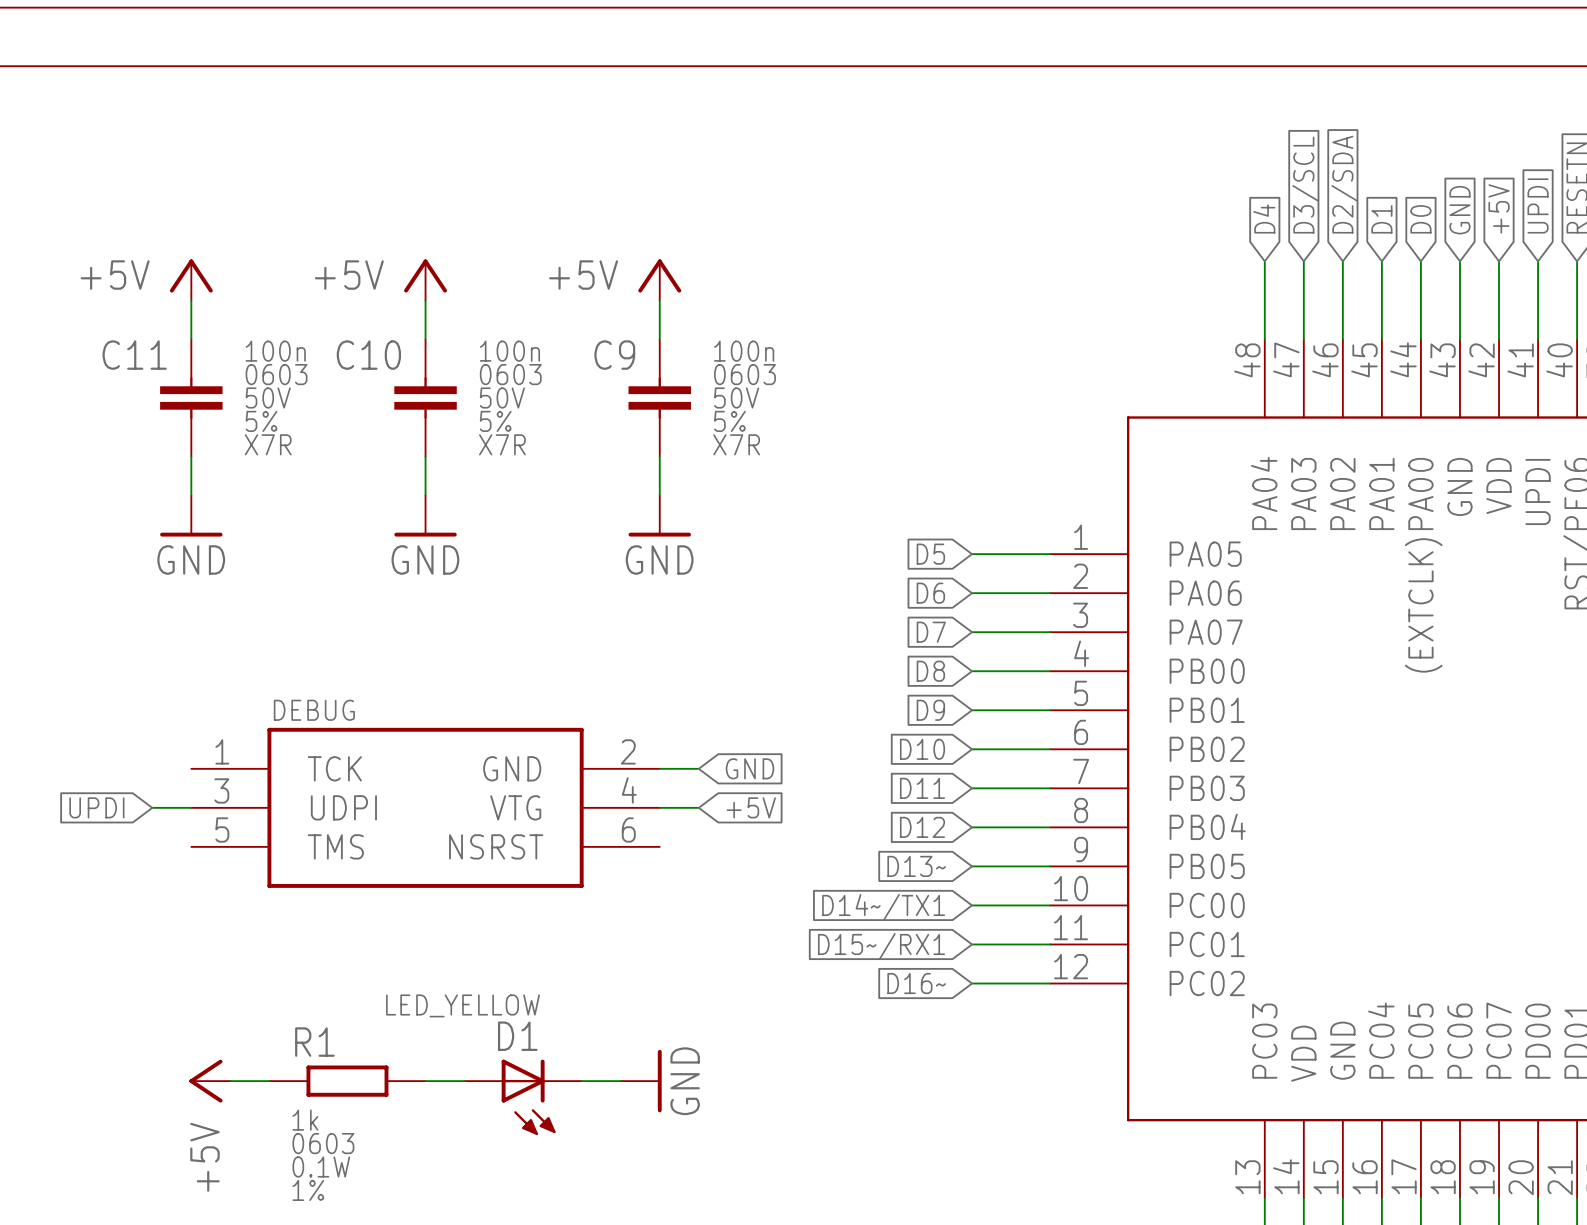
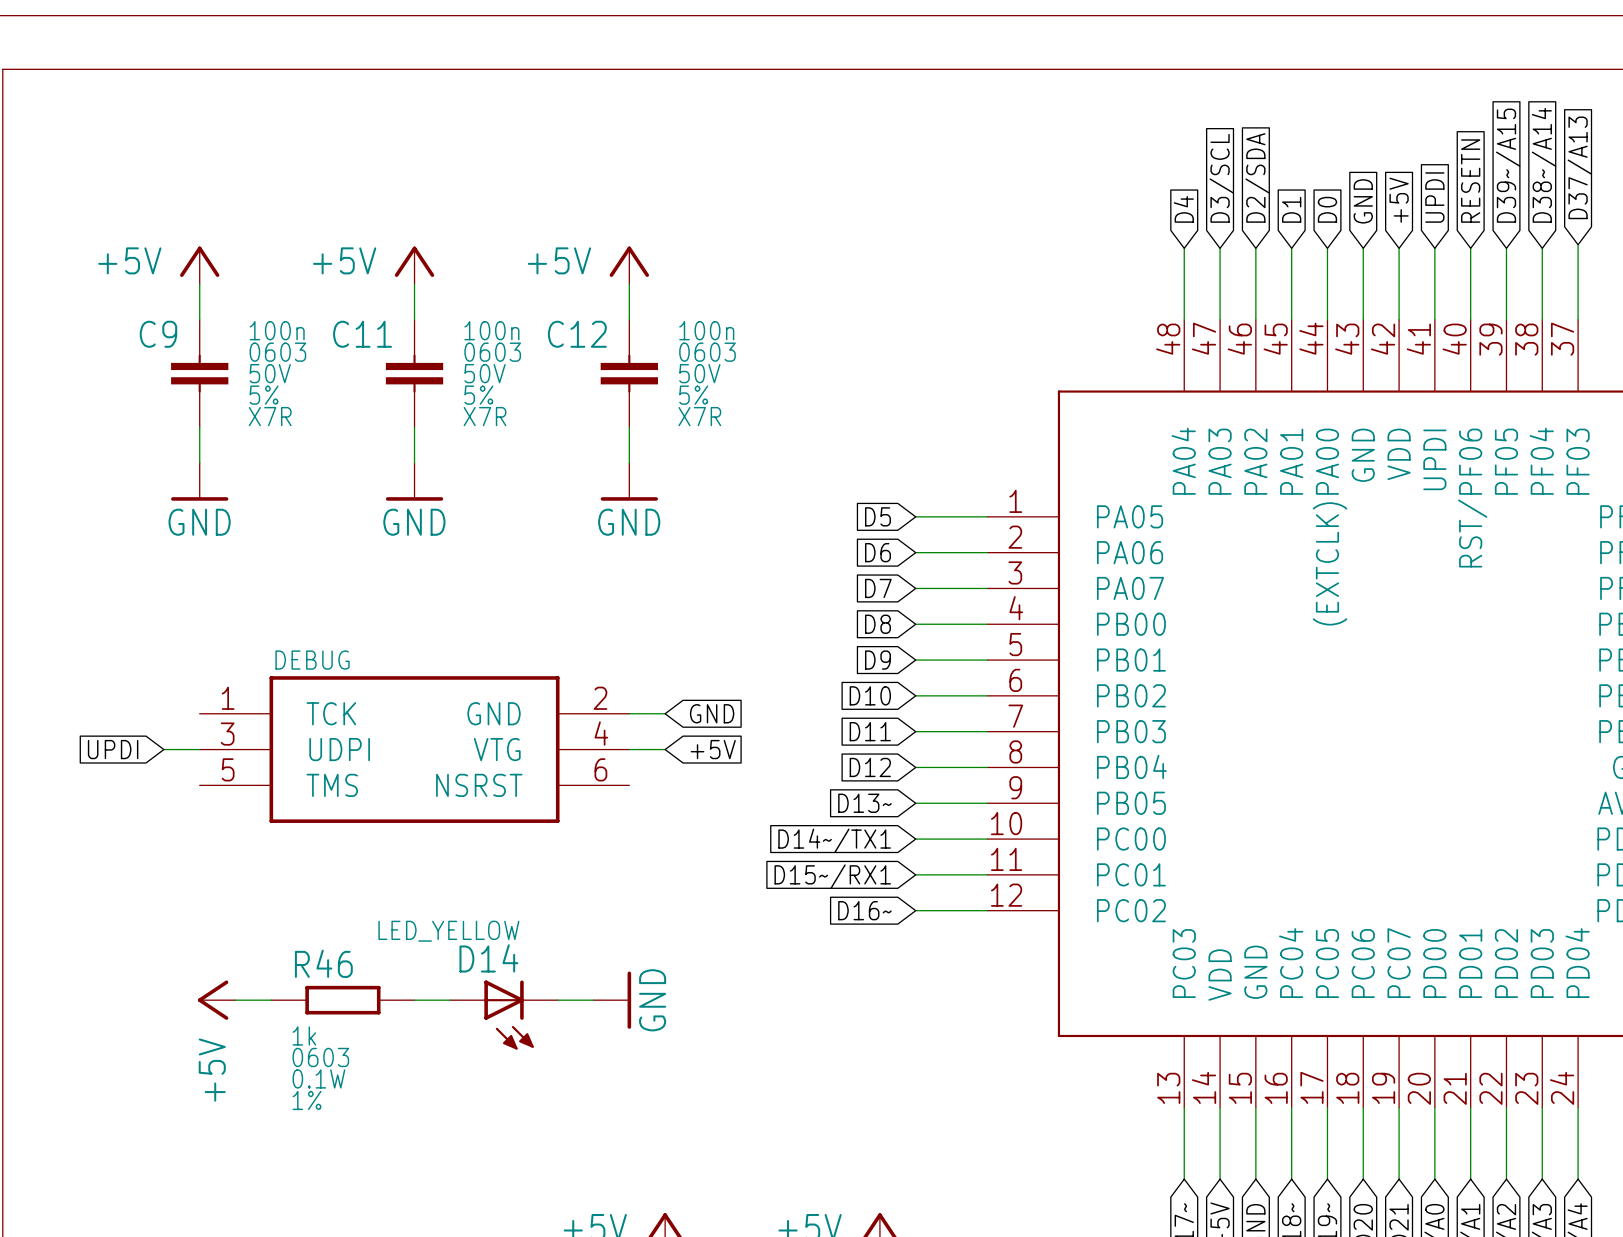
C11 name: C11 (134, 355) -> C9 (158, 334)
C10 name: C10 (368, 355) -> C11 (362, 334)
C9 name: C9 (614, 355) -> C12 (577, 334)
D1 name: D1 (517, 1036) -> D14 (488, 958)
R1 name: R1 (314, 1042) -> R46 (323, 963)

